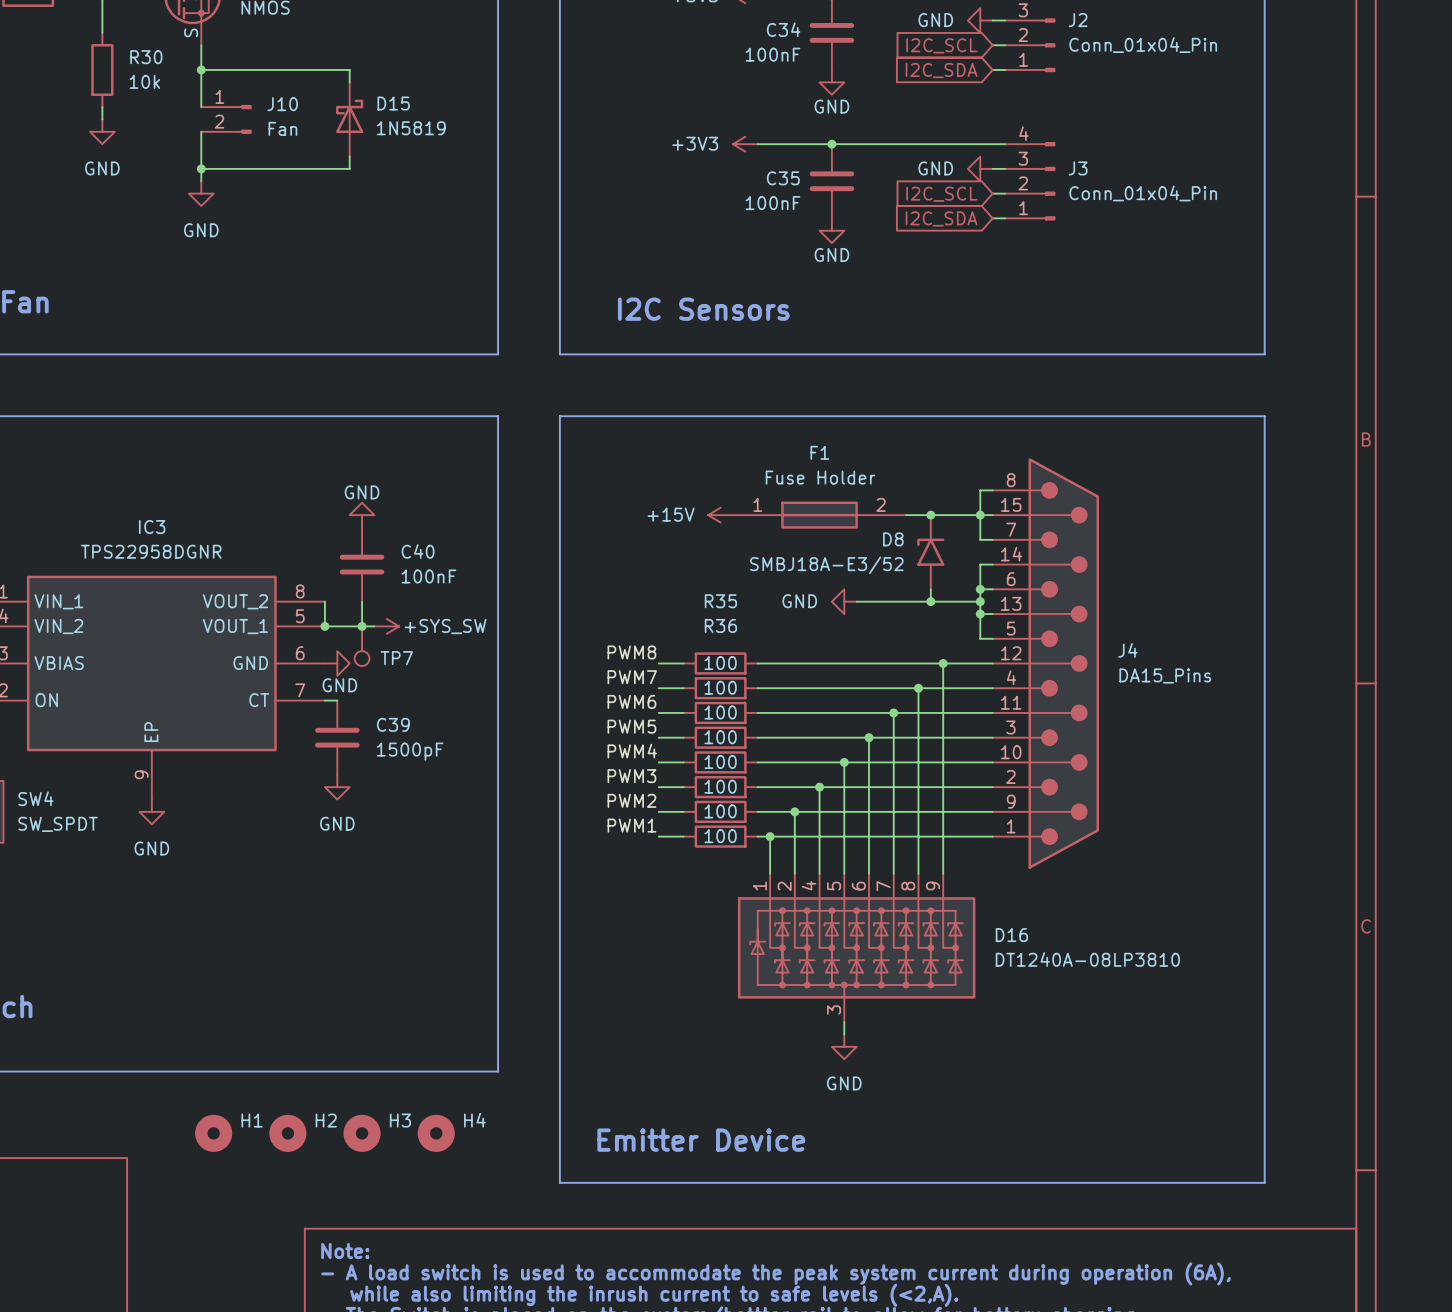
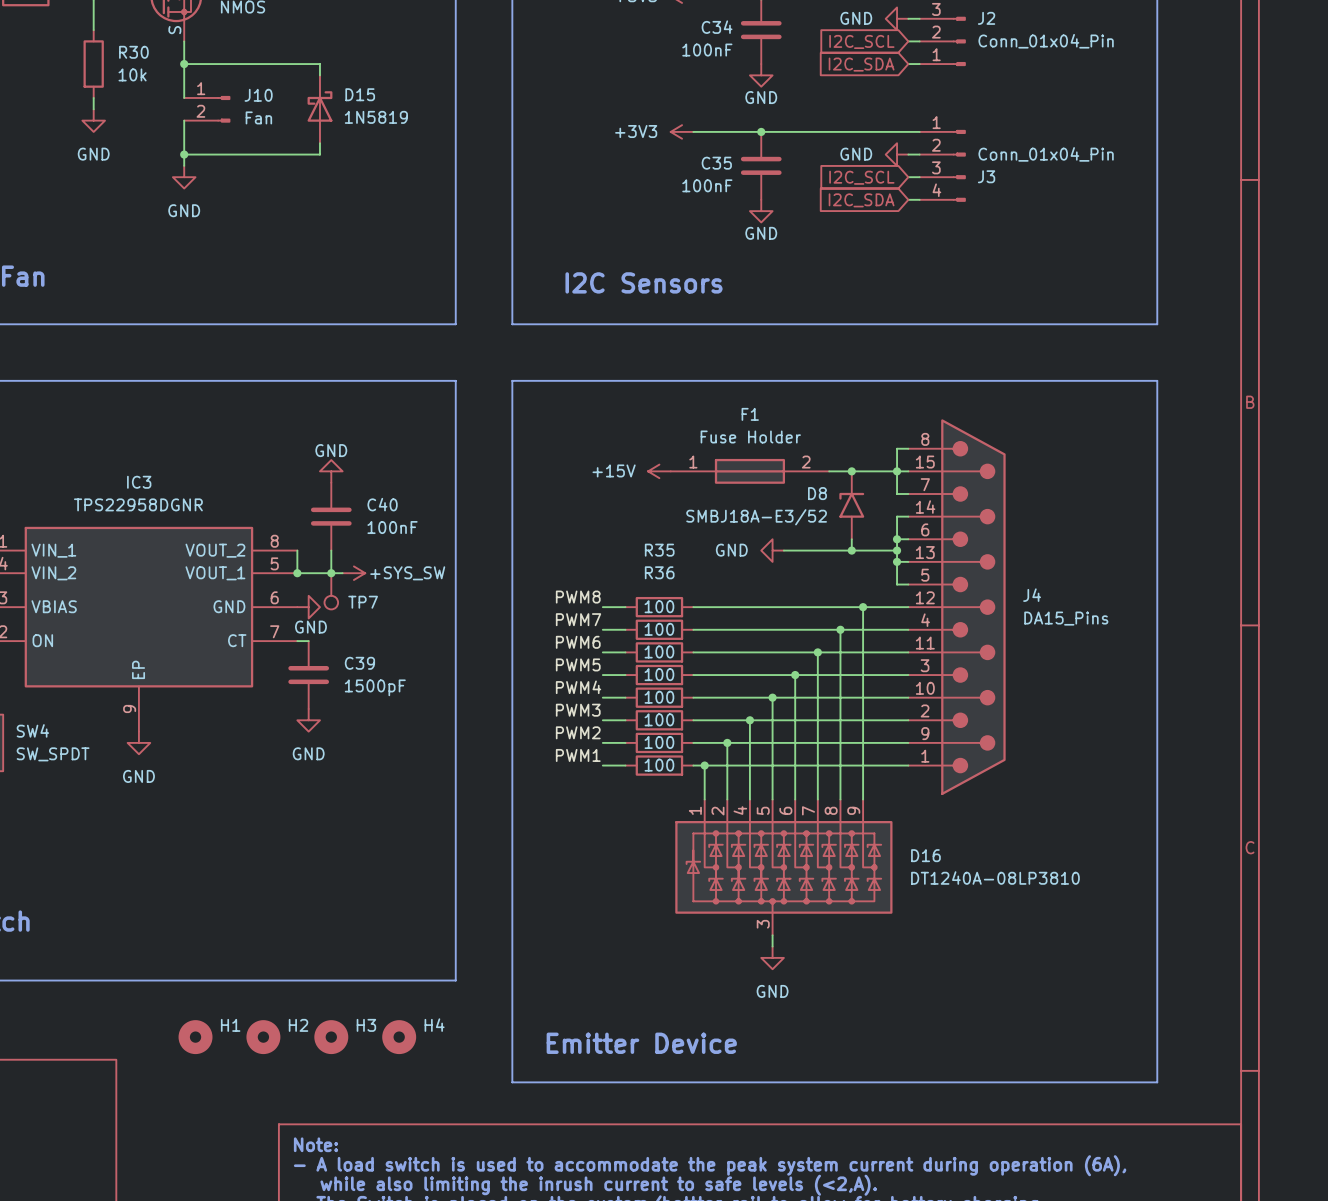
J3 flip: as is (1048, 181) -> up-down (959, 165)

